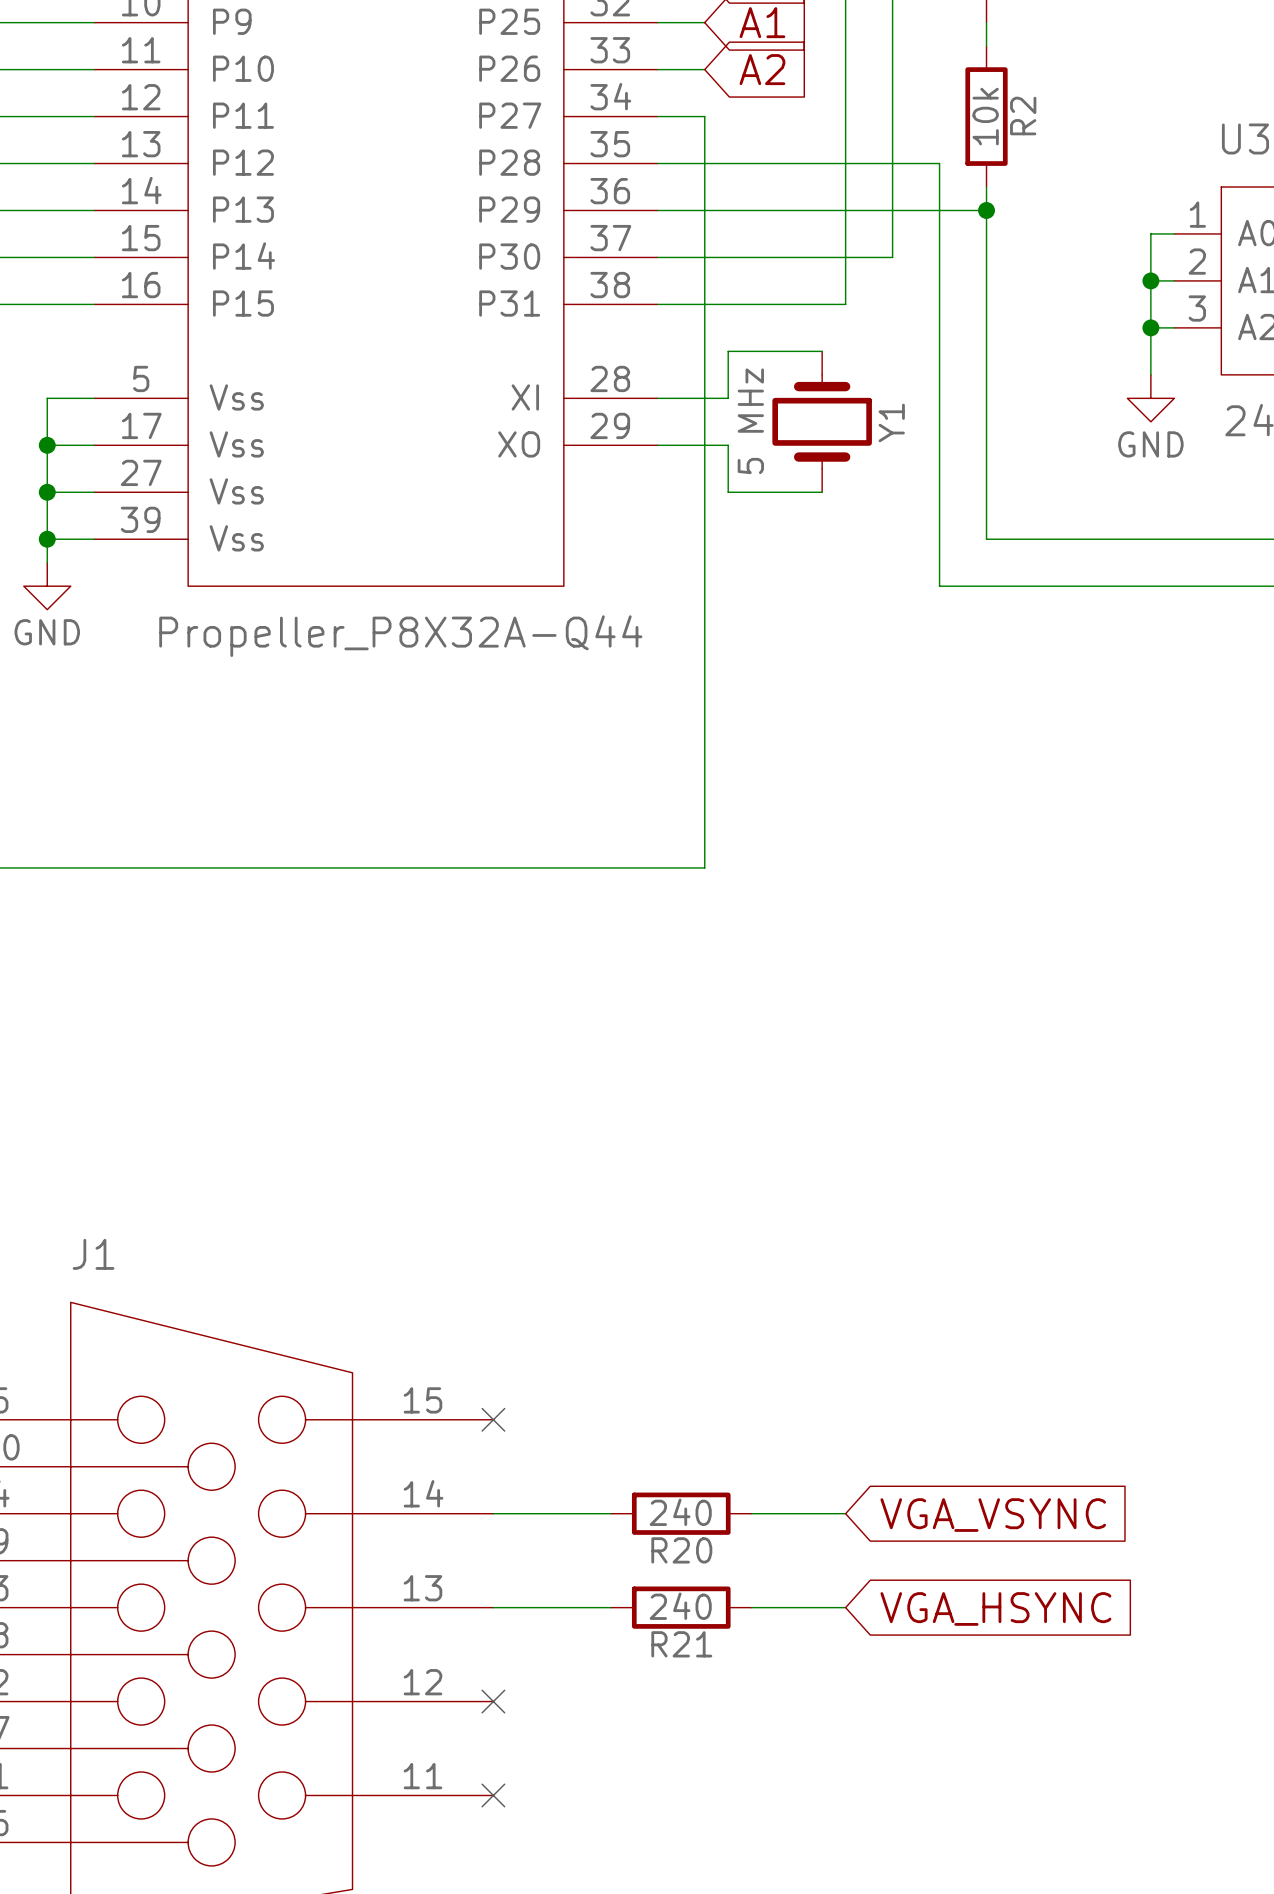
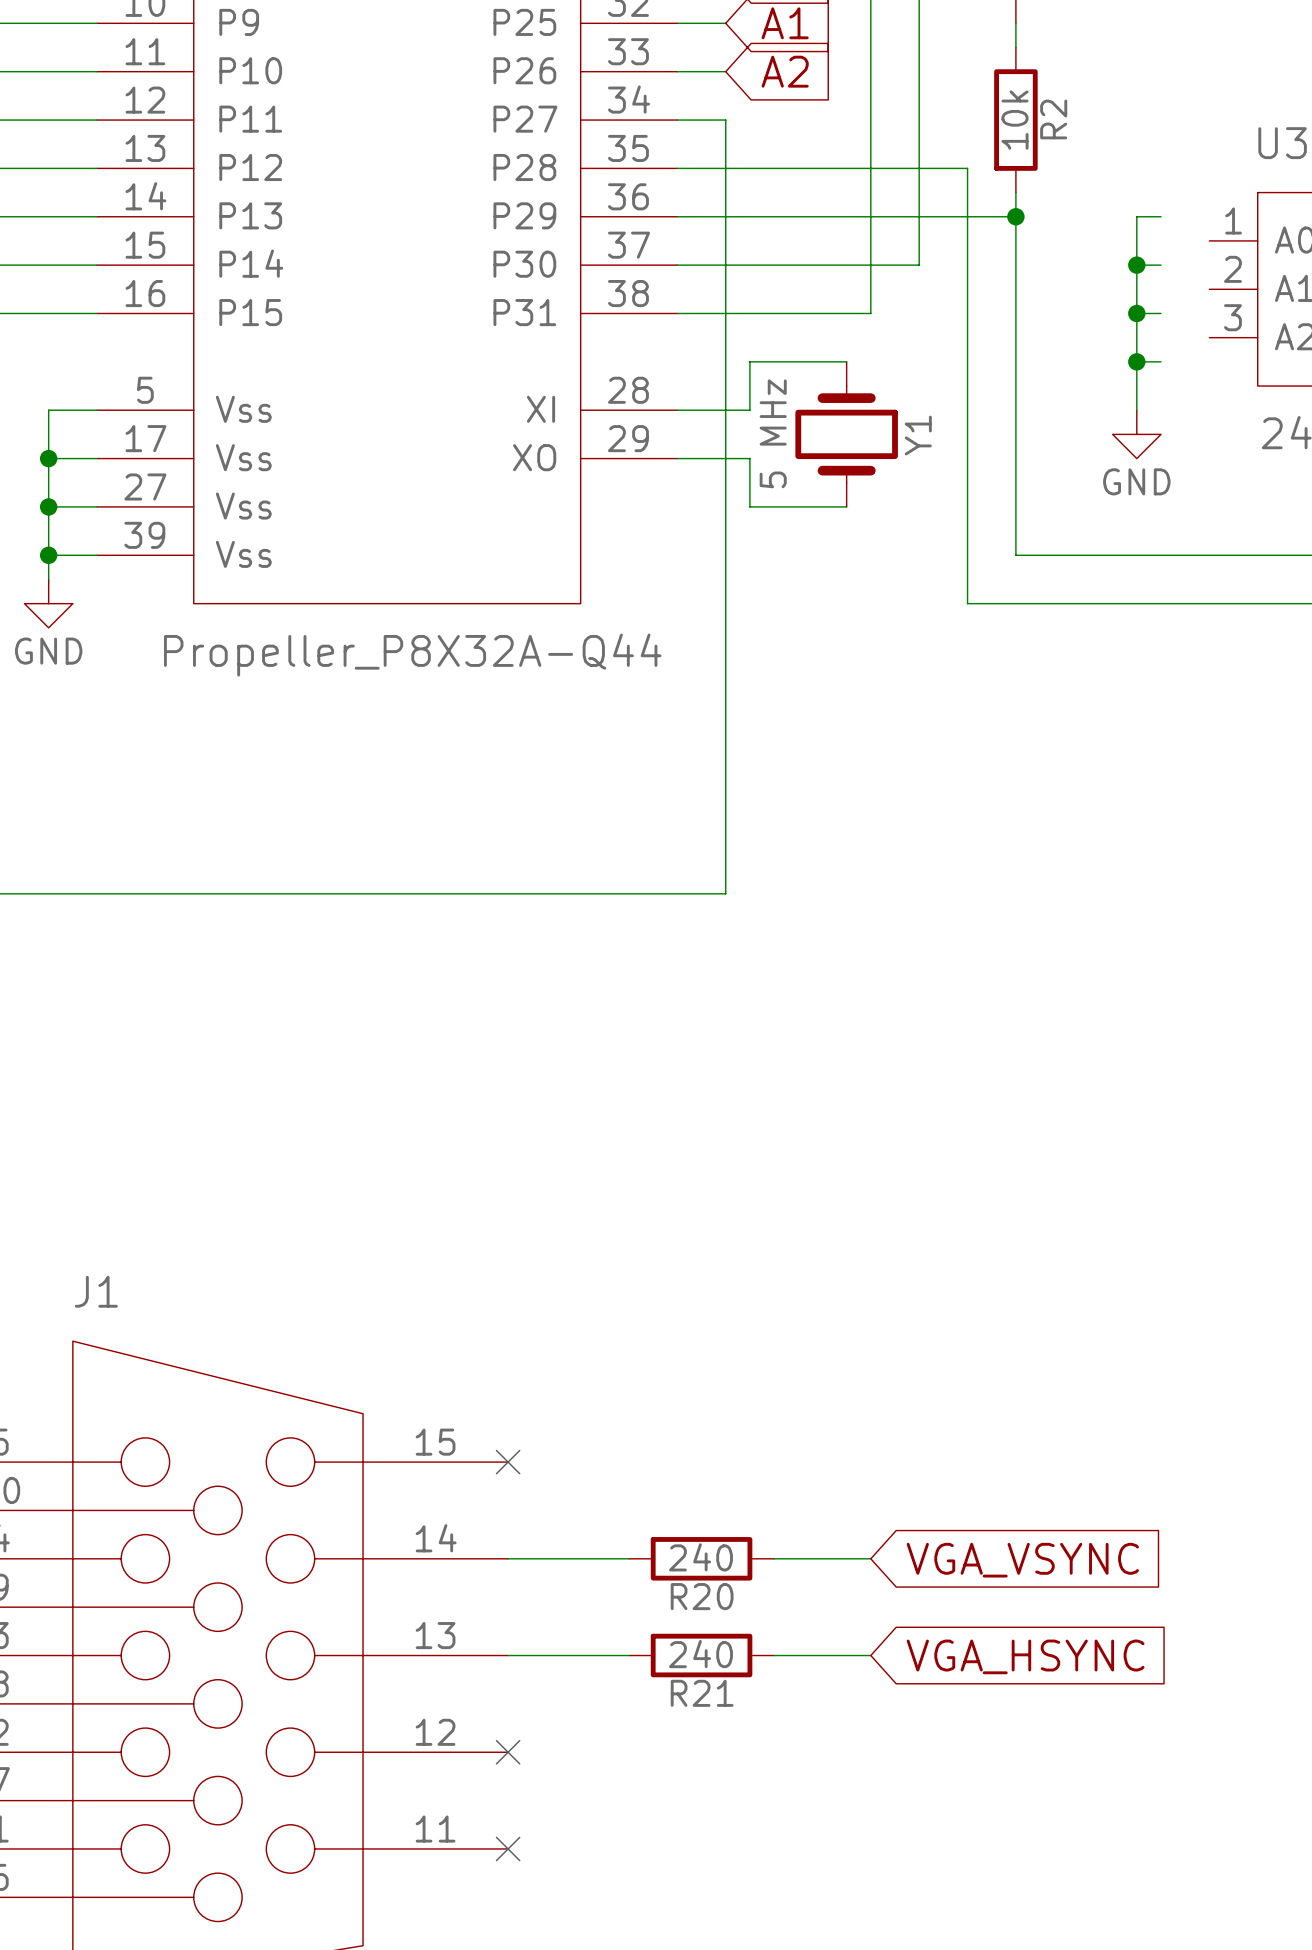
wire: none -> (1160, 216) (1136, 216) (1136, 410)
wire: (1174, 233) (1150, 233) (1150, 374) -> none
junction: none -> (1136, 265)
wire: (1150, 280) (1174, 280) -> (1136, 265) (1160, 265)
junction: (1150, 280) -> none
junction: none -> (1136, 313)
wire: (1150, 327) (1174, 327) -> (1136, 313) (1160, 313)
junction: (1150, 327) -> none
wire: none -> (1136, 361) (1160, 361)
junction: none -> (1136, 361)
power symbol position: GND (1150, 398) -> GND (1136, 434)

